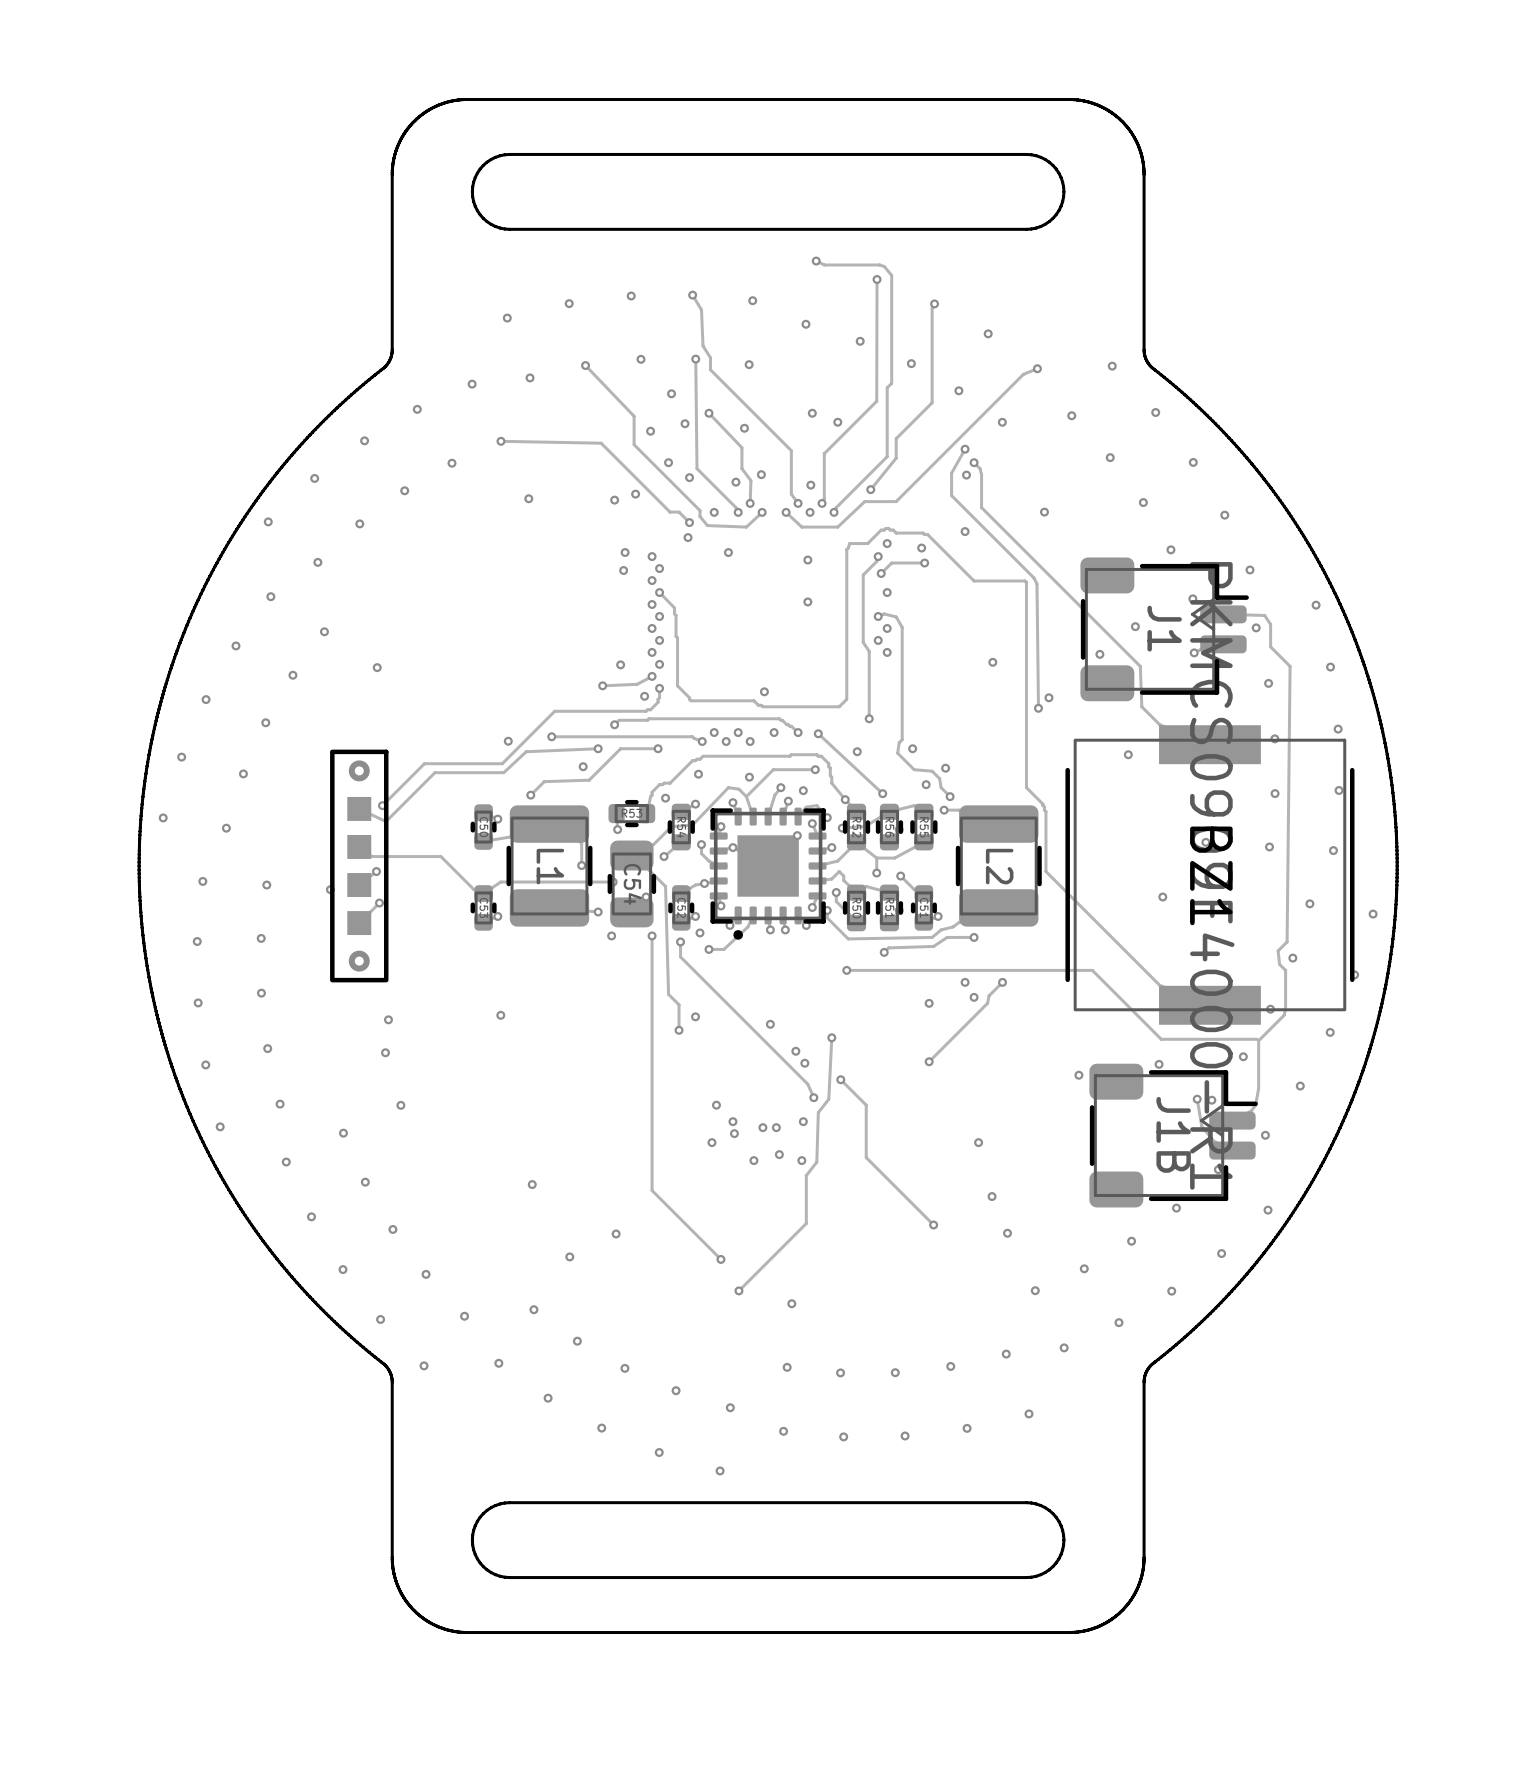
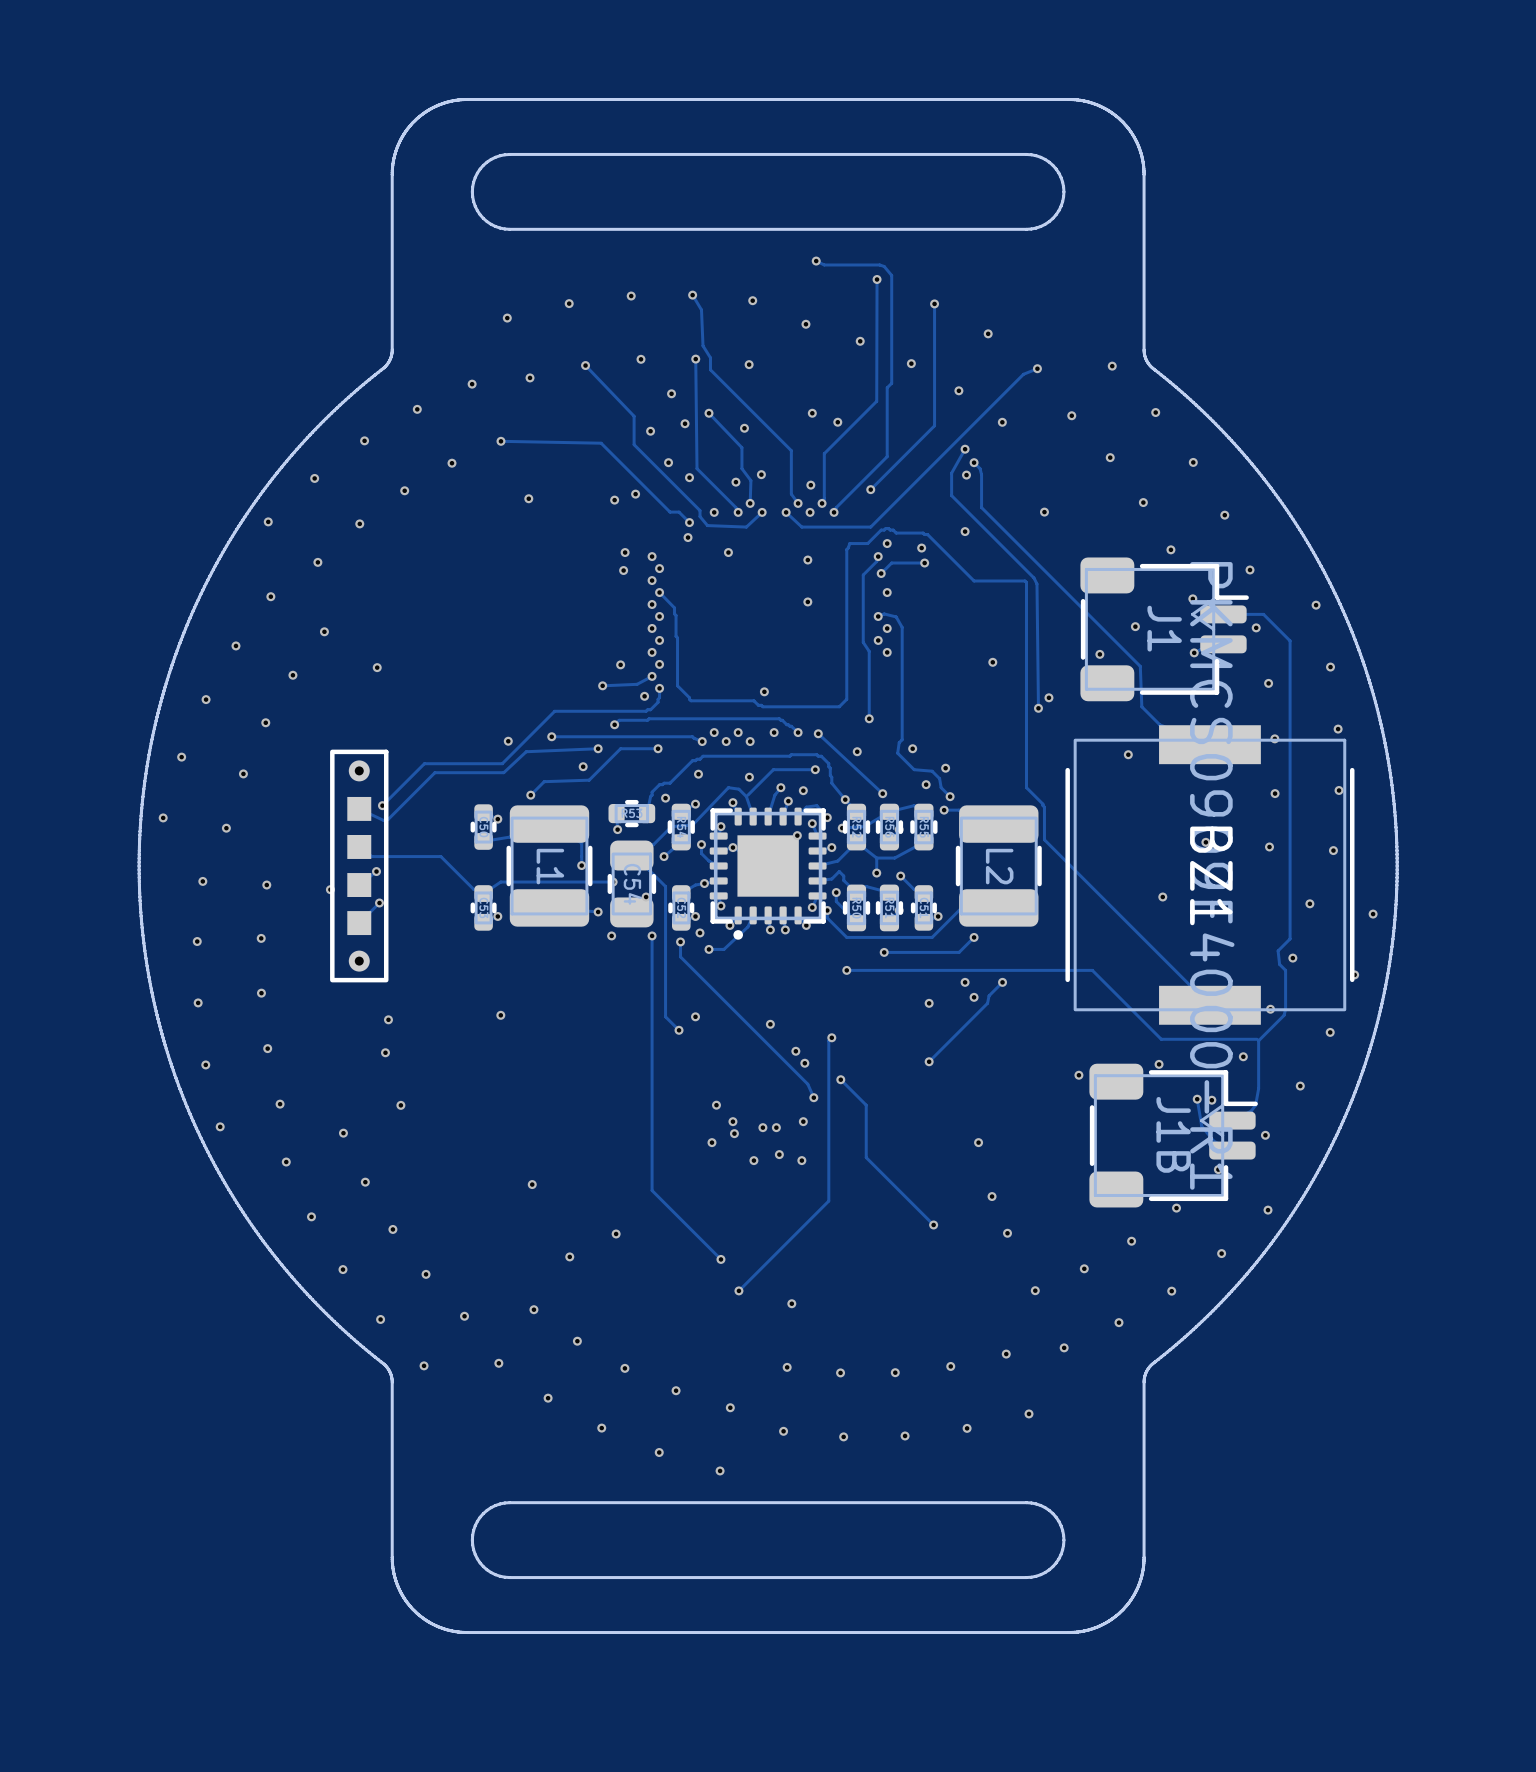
track: (934, 303) (932, 308) (932, 402) (896, 438) (896, 458) (870, 489) -> (934, 303) (934, 425) (870, 489)
track: (896, 501) (864, 501) (837, 527) -> (896, 501) (870, 527) (837, 527)
track: (1223, 614) (1264, 615) (1270, 624) (1270, 646) (1290, 666) (1287, 941) -> (1223, 614) (1263, 614) (1290, 640) (1290, 938) (1287, 941)
track: (1044, 810) (1045, 871) (1159, 985) (1209, 1005) -> (1044, 810) (1044, 839) (1209, 1005)
track: (665, 886) (668, 994) (679, 1004) (679, 1030) -> (665, 886) (665, 1016) (679, 1030)
track: (998, 907) (941, 929) (932, 937) (846, 937) -> (998, 907) (961, 907) (932, 937) (846, 937)
track: (974, 937) (947, 937) (933, 946) (888, 947) (884, 952) -> (974, 937) (959, 952) (884, 952)
track: (831, 1037) (828, 1099) (818, 1112) (816, 1162) (806, 1175) (806, 1223) -> (831, 1037) (828, 1040) (828, 1201) (806, 1223)

